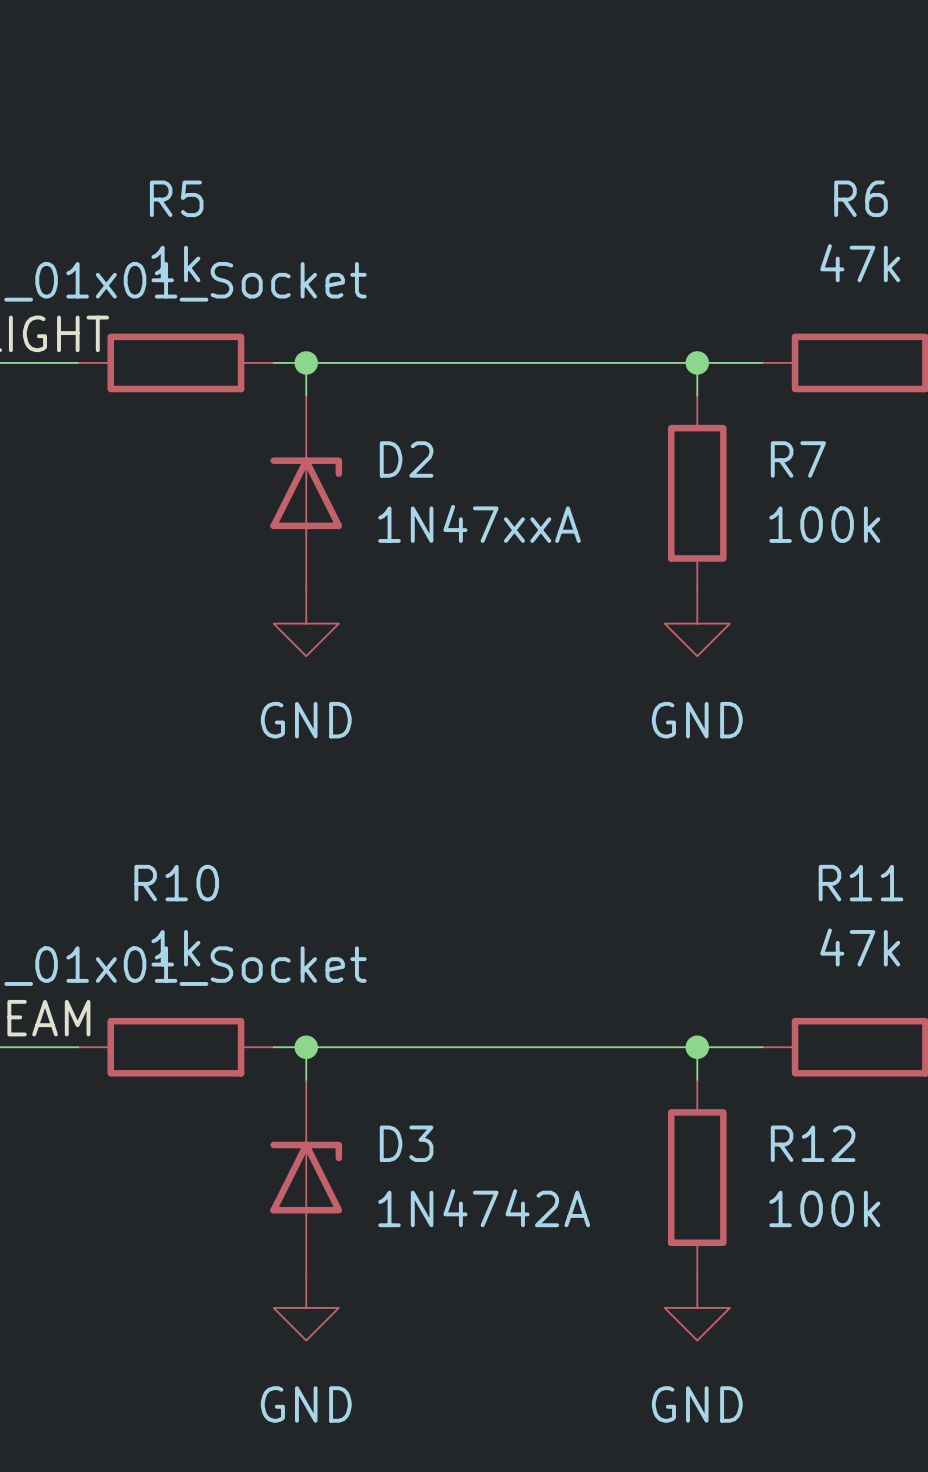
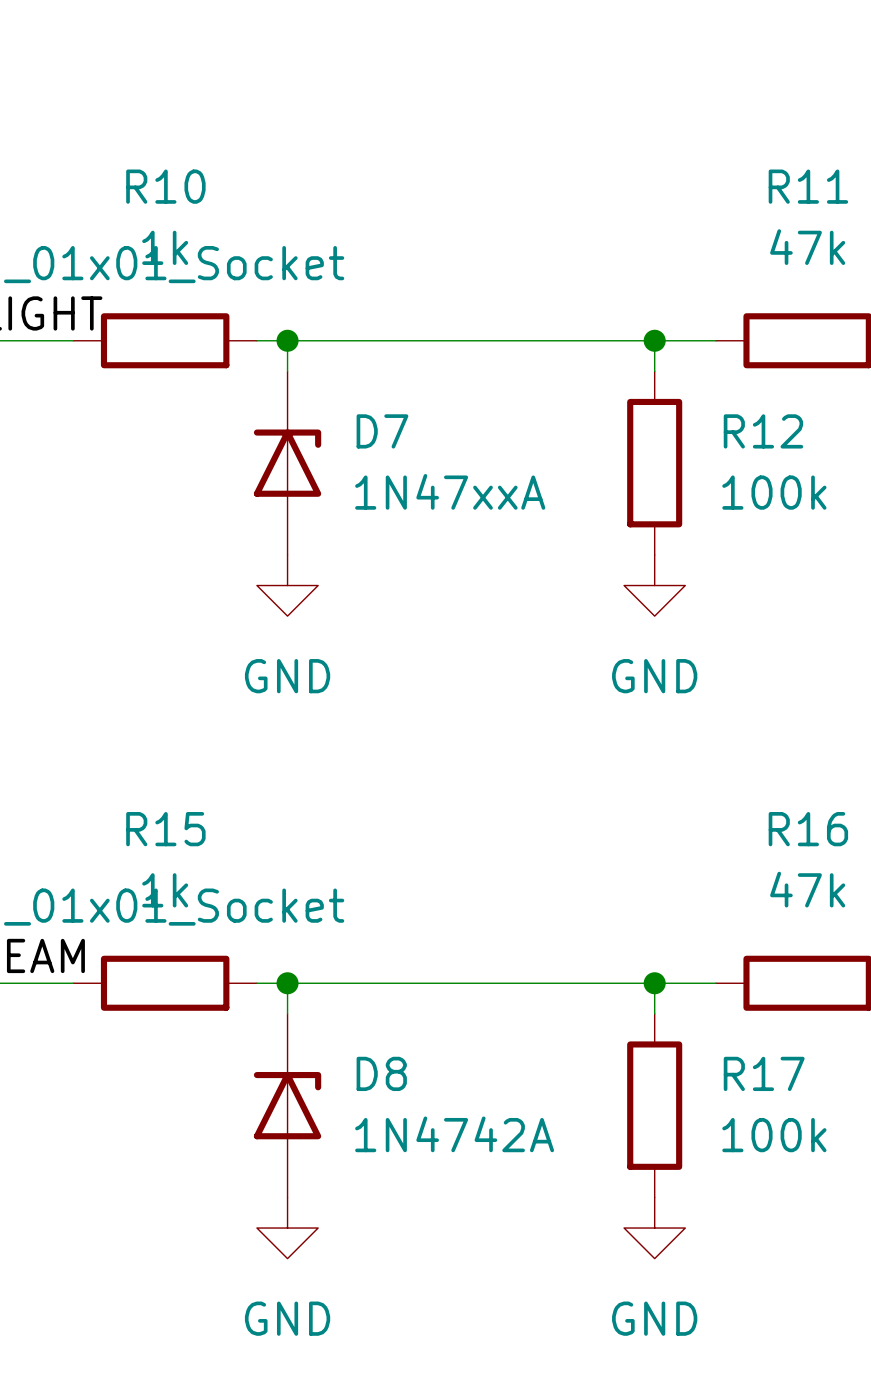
R5 name: R5 (176, 198) -> R10 (165, 186)
R6 name: R6 (860, 198) -> R11 (808, 186)
D2 name: D2 (406, 459) -> D7 (382, 431)
R7 name: R7 (798, 459) -> R12 (763, 431)
R10 name: R10 (176, 883) -> R15 (165, 829)
R11 name: R11 (860, 883) -> R16 (808, 829)
D3 name: D3 (406, 1143) -> D8 (381, 1073)
R12 name: R12 (813, 1143) -> R17 (764, 1073)

